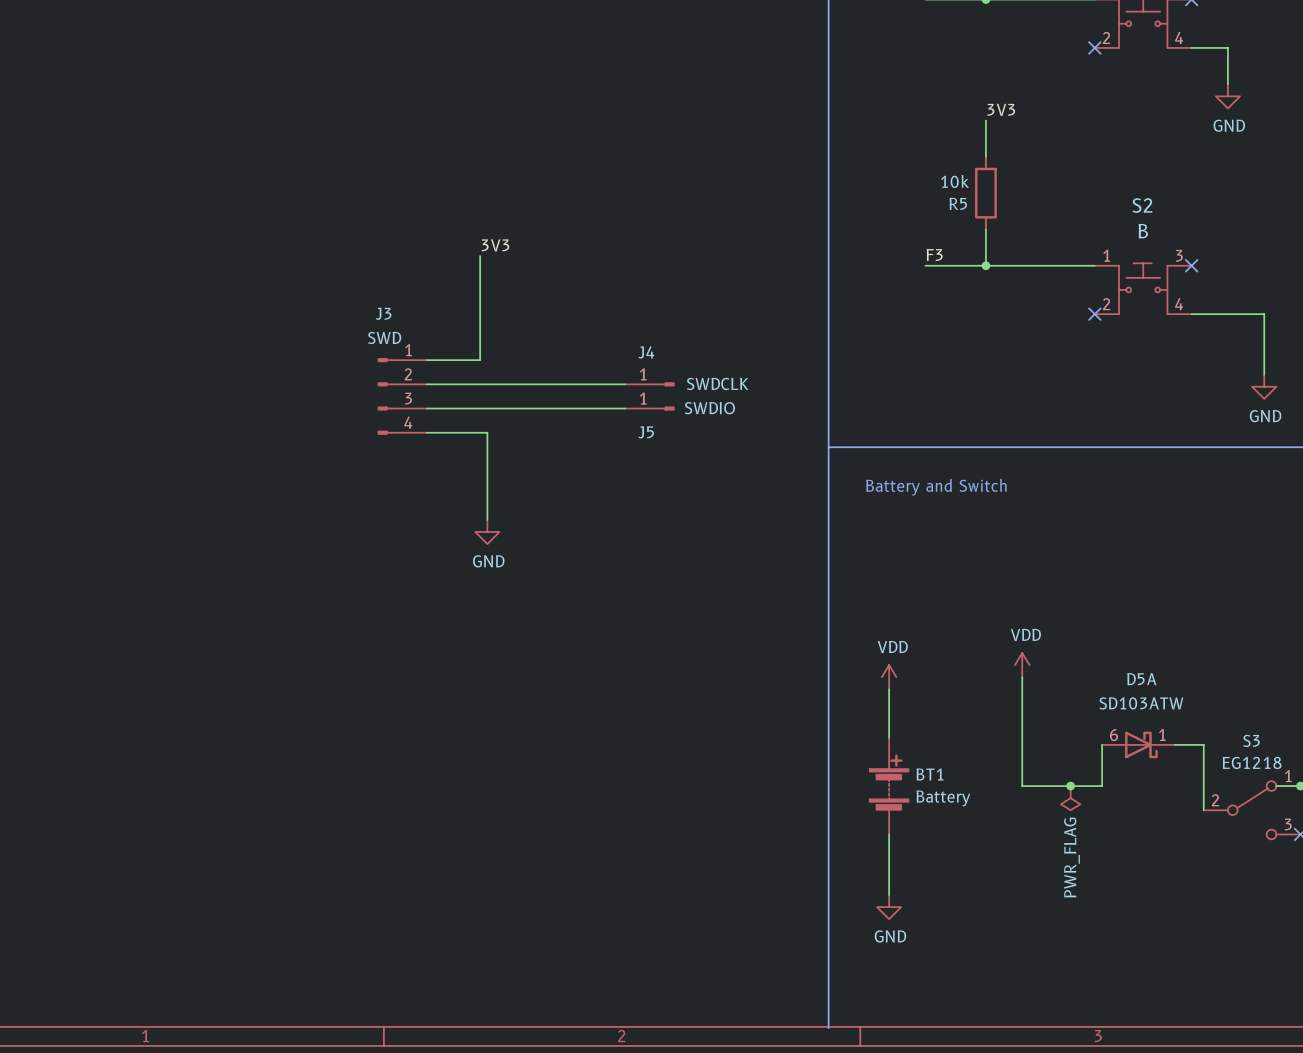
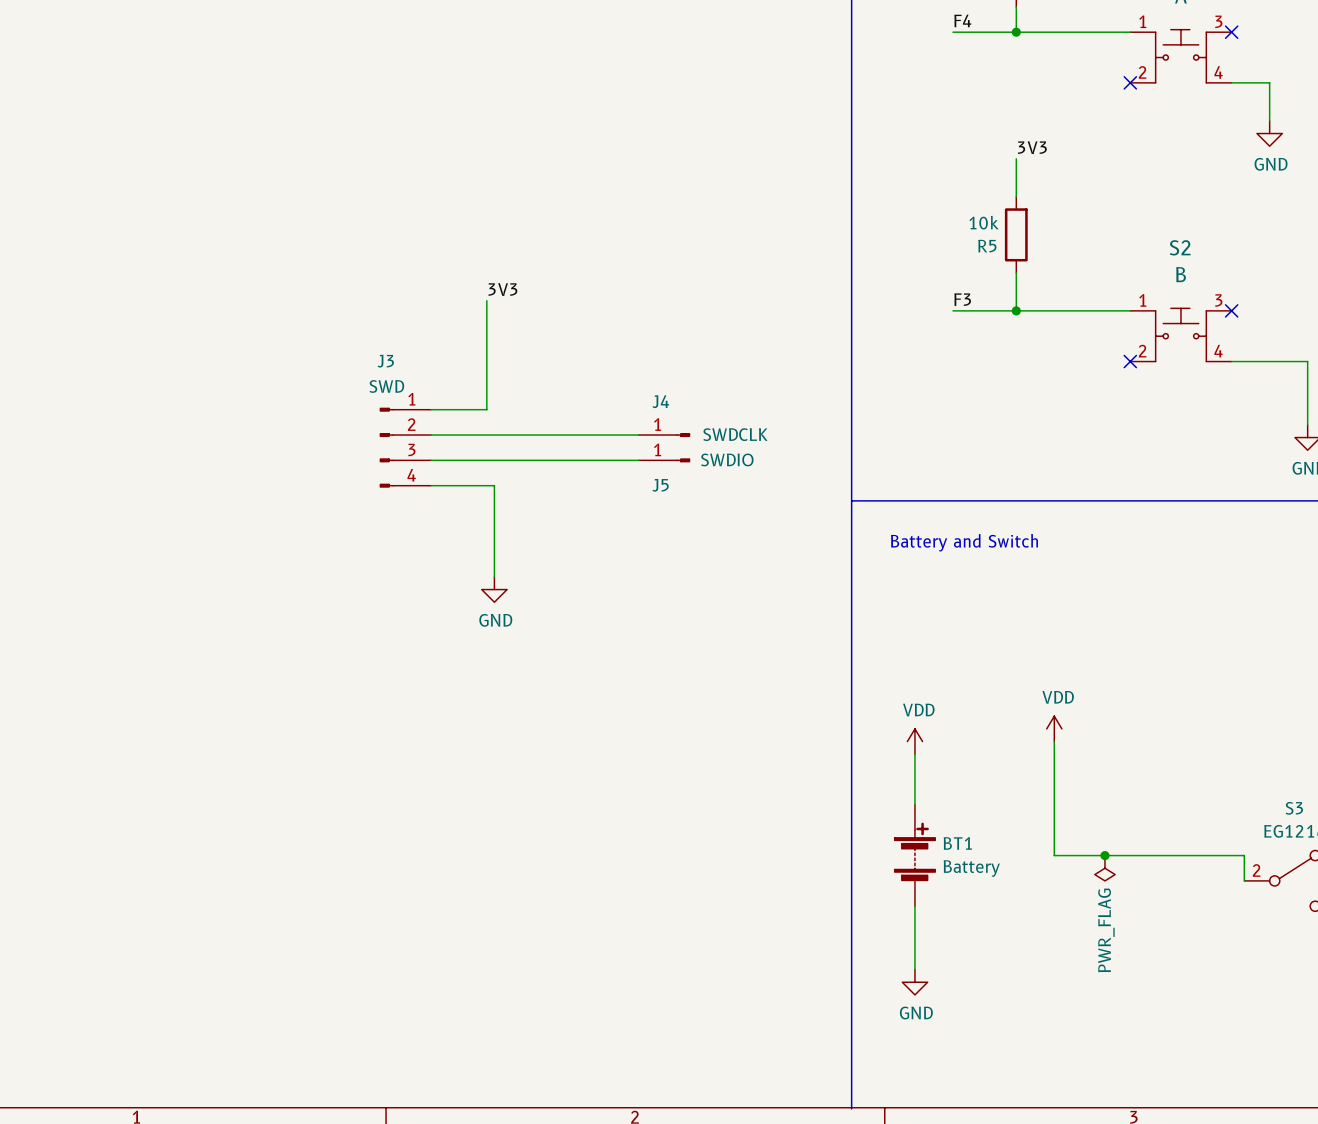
wire: (1102, 744) (1102, 786) -> none
D5A: SD103ATW (1138, 744) -> none
wire: (1174, 744) (1203, 744) (1203, 786) -> (1137, 855) (1244, 855)

